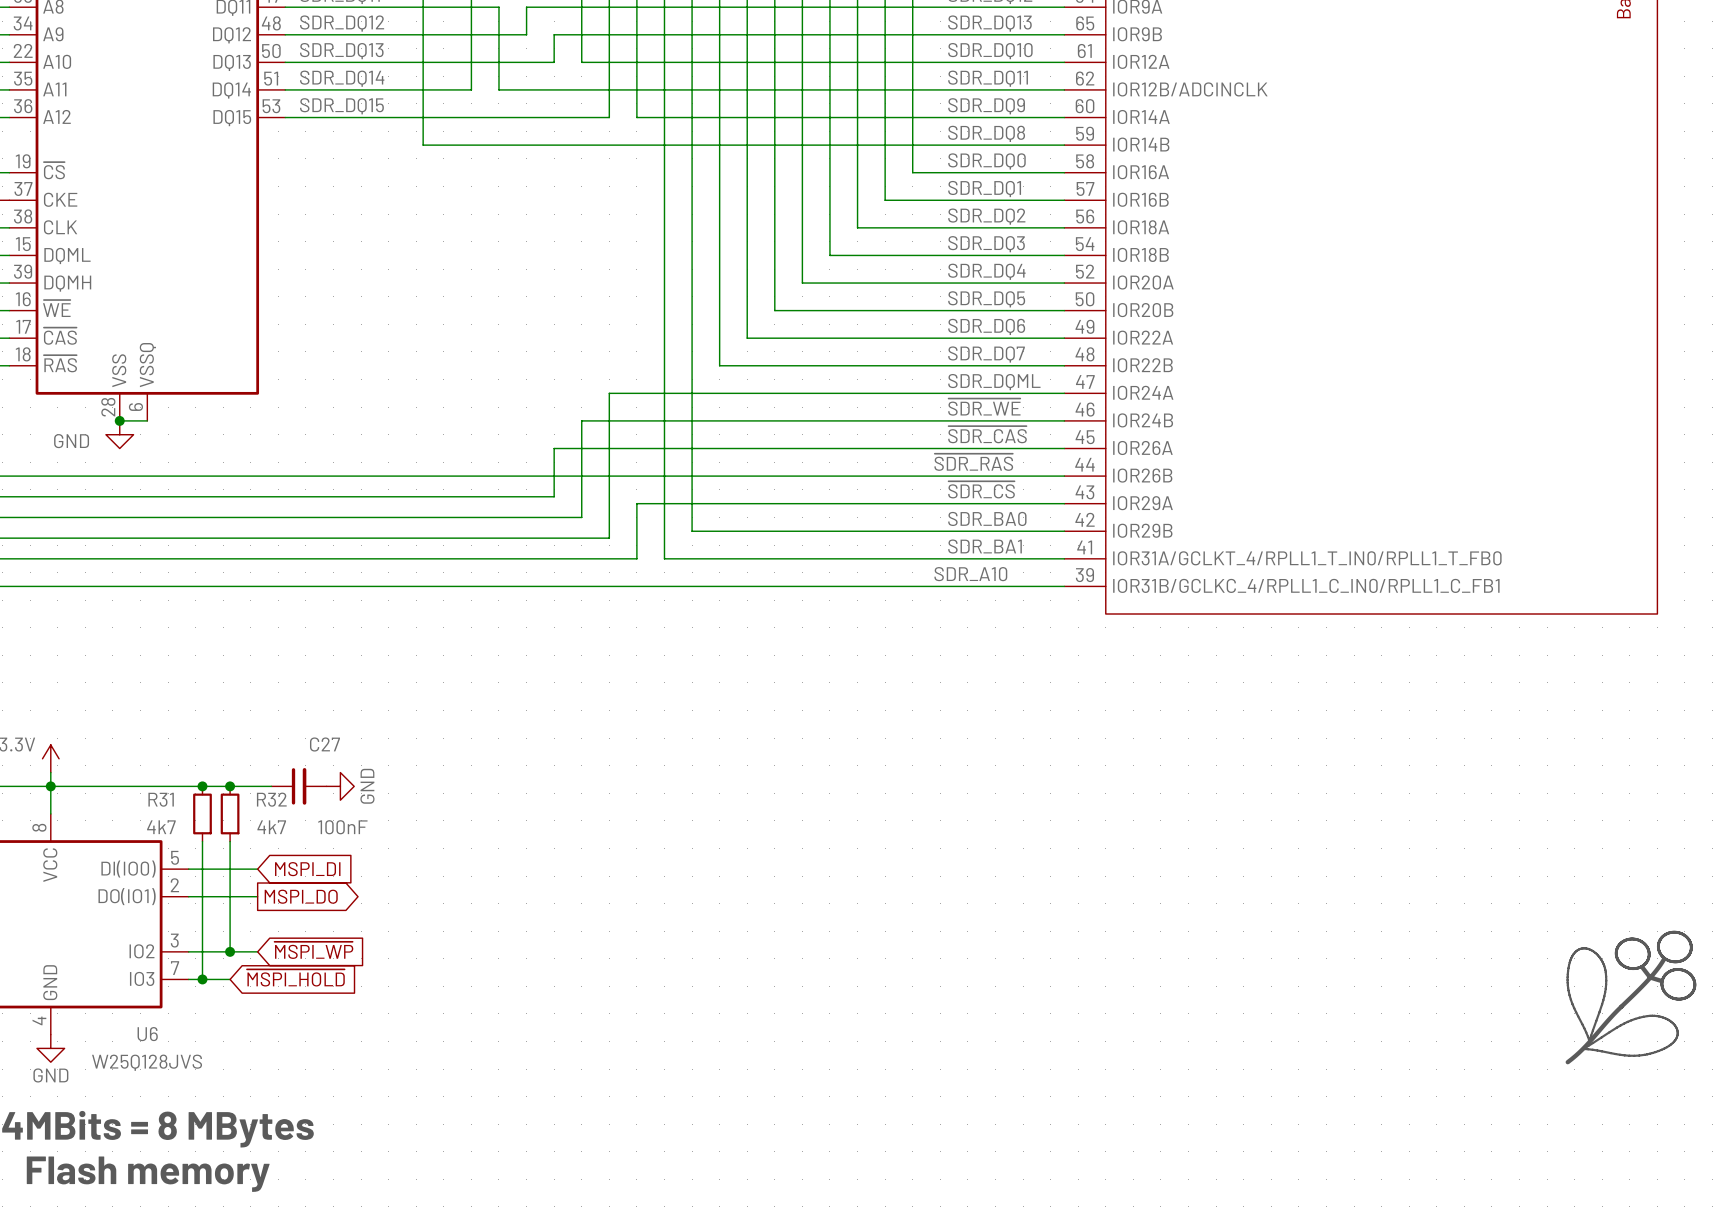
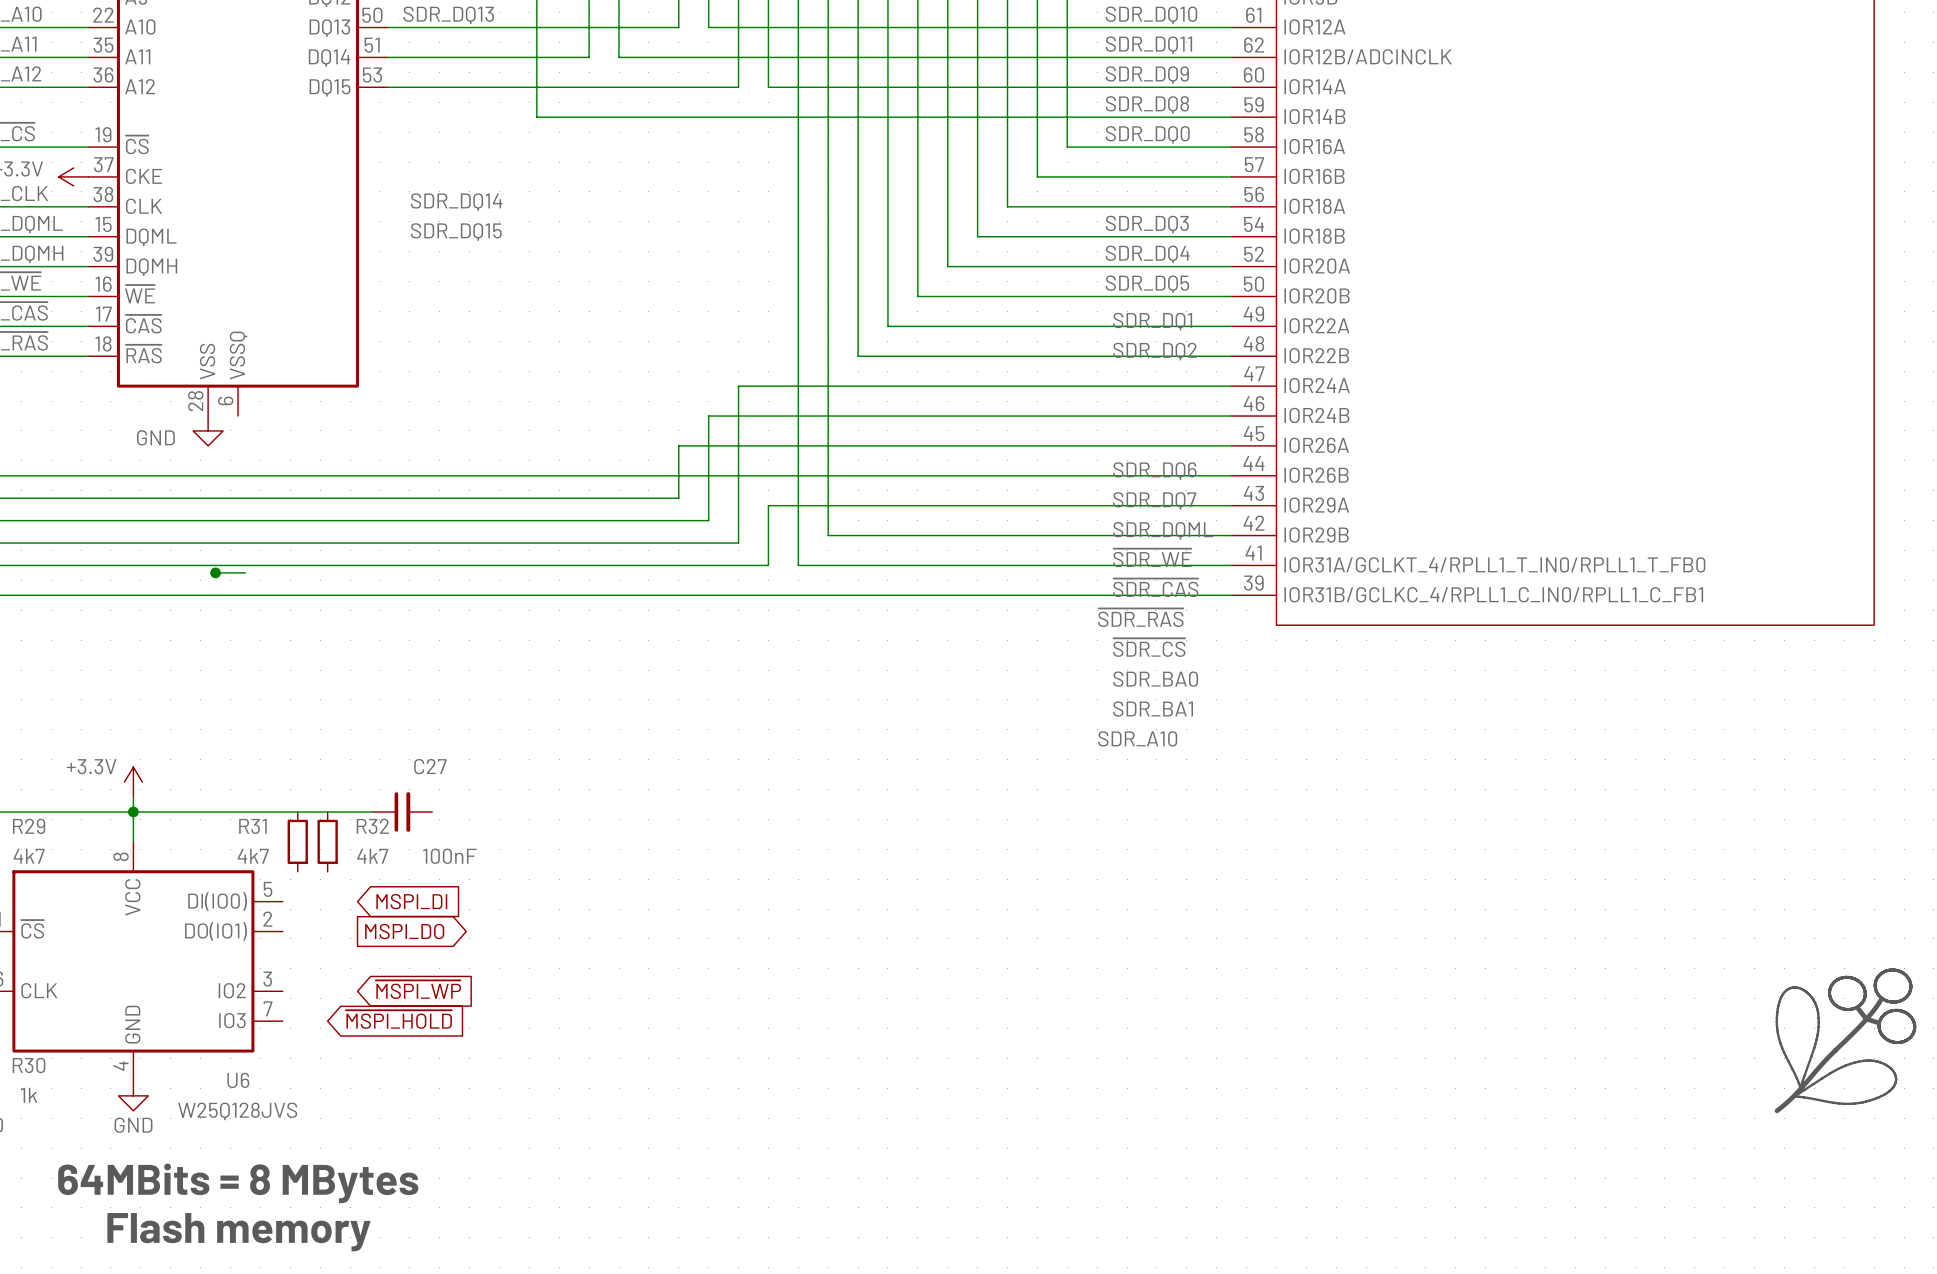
label position: SDR_DQ14 (342, 78) -> SDR_DQ14 (456, 202)
label position: SDR_DQ15 (341, 106) -> SDR_DQ15 (456, 231)
label position: SDR_DQ1 (984, 189) -> SDR_DQ1 (1152, 321)
label position: SDR_DQ2 (986, 216) -> SDR_DQ2 (1155, 351)
label position: SDR_DQ6 (986, 326) -> SDR_DQ6 (1154, 471)
label position: SDR_DQ7 (986, 354) -> SDR_DQ7 (1154, 500)
label position: SDR_DQML (994, 382) -> SDR_DQML (1163, 530)
label position: ~{SDR_WE} (984, 407) -> ~{SDR_WE} (1152, 557)
wire: (119, 420) (147, 420) -> (215, 572) (245, 572)
junction: (119, 420) -> none
label position: ~{SDR_CAS} (987, 434) -> ~{SDR_CAS} (1155, 587)
label position: ~{SDR_RAS} (973, 462) -> ~{SDR_RAS} (1140, 617)
label position: ~{SDR_CS} (981, 489) -> ~{SDR_CS} (1149, 647)
label position: SDR_BA0 (987, 518) -> SDR_BA0 (1155, 679)
label position: SDR_BA1 (985, 546) -> SDR_BA1 (1153, 709)
junction: none -> (215, 572)
label position: SDR_A10 (970, 574) -> SDR_A10 (1137, 738)
junction: (202, 786) -> none
junction: (230, 786) -> none
power symbol: GND (340, 786) -> none
wire: (202, 841) (202, 979) -> none
wire: (230, 841) (230, 951) -> none
wire: (188, 869) (257, 869) -> none
wire: (188, 896) (257, 896) -> none
wire: (188, 951) (257, 951) -> none
junction: (230, 951) -> none
wire: (188, 979) (230, 979) -> none
junction: (202, 979) -> none

